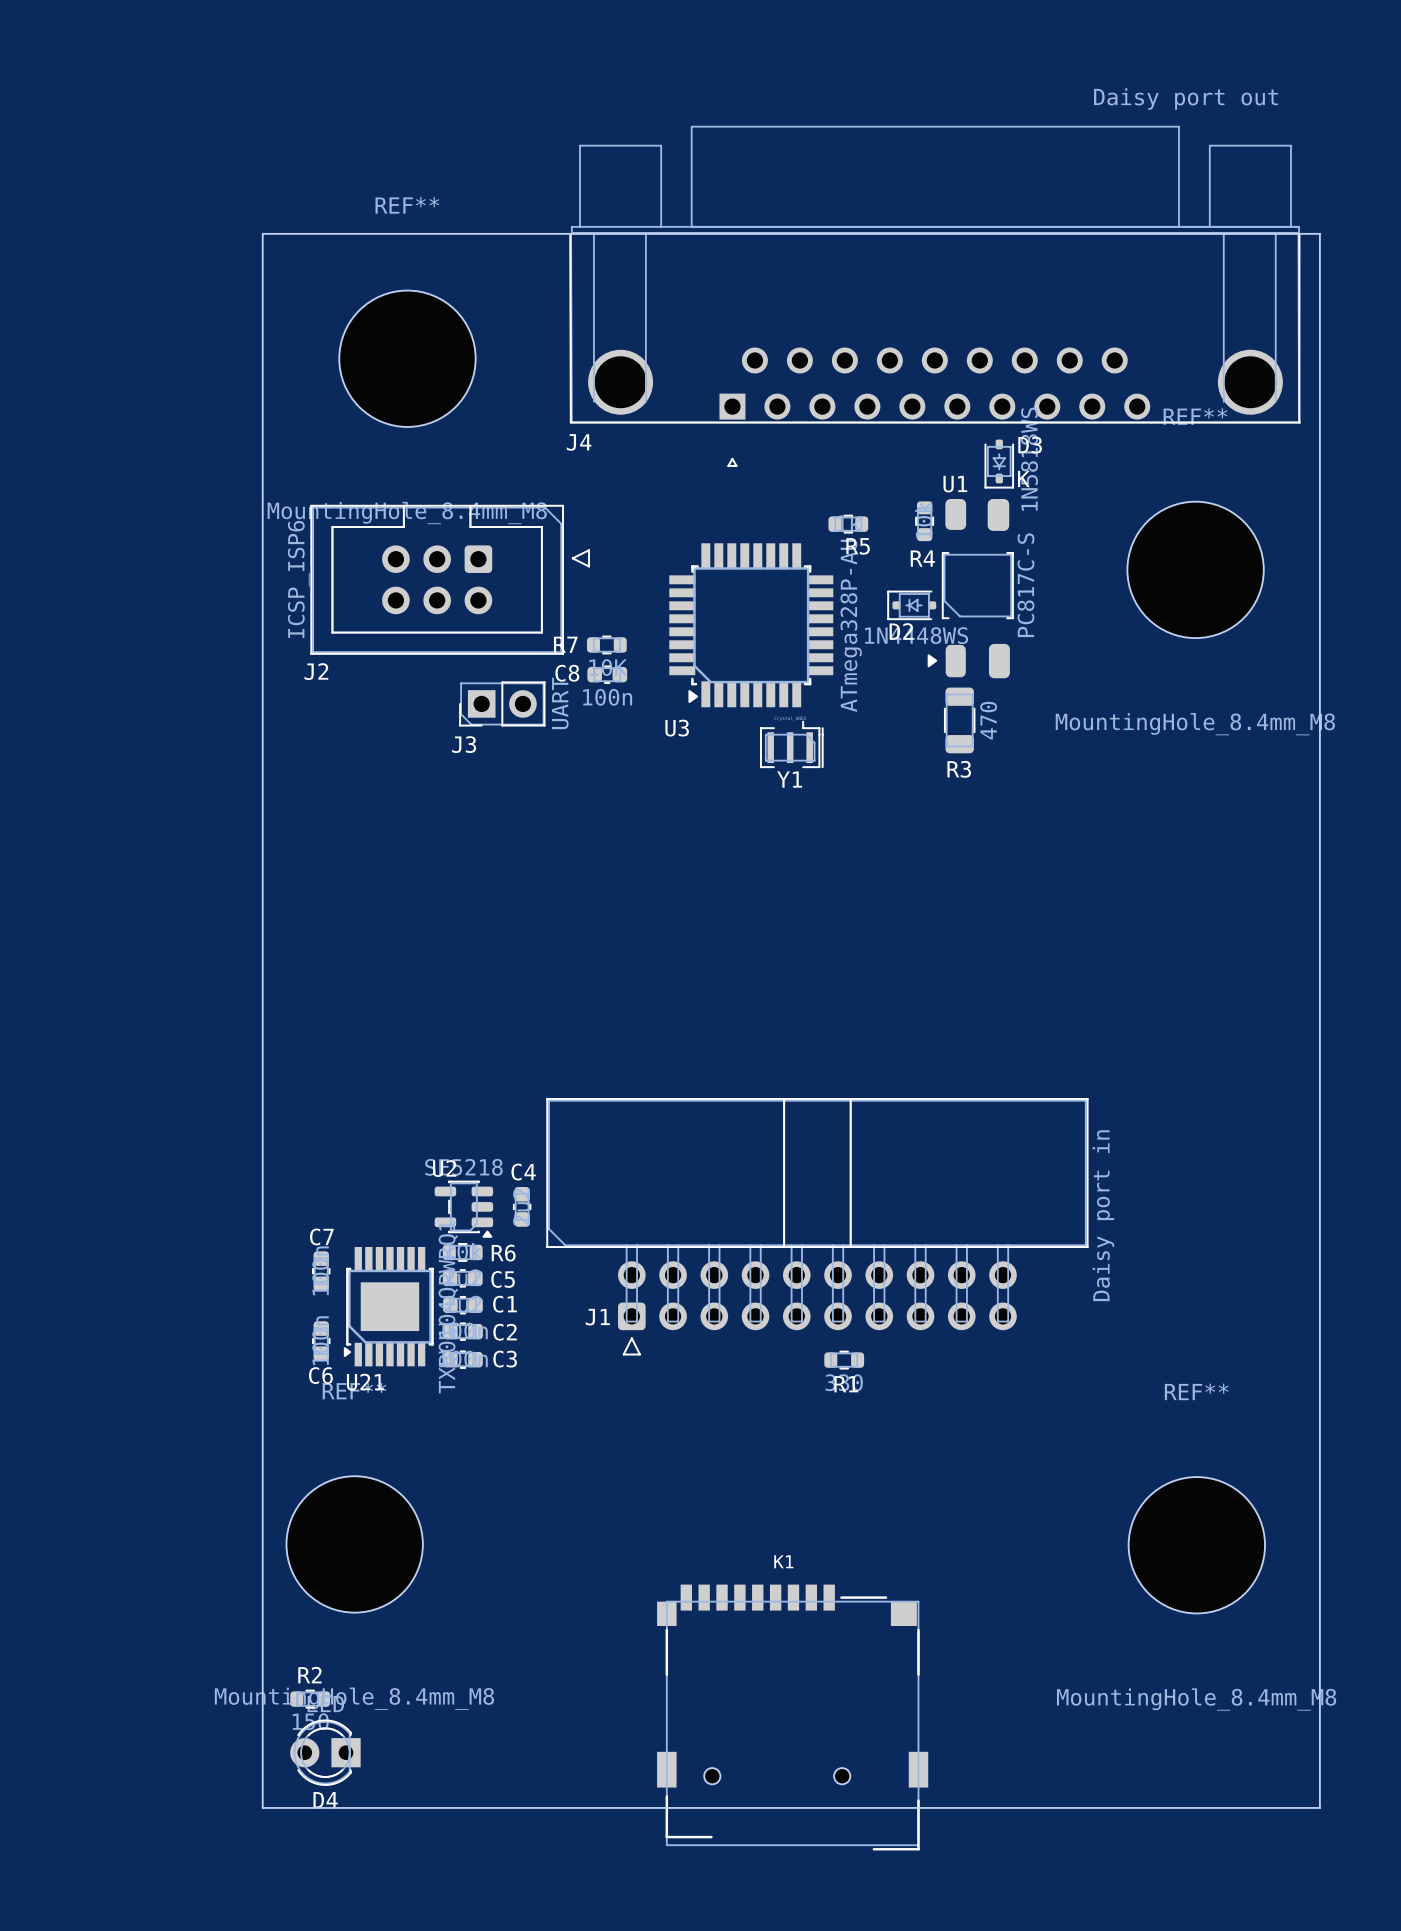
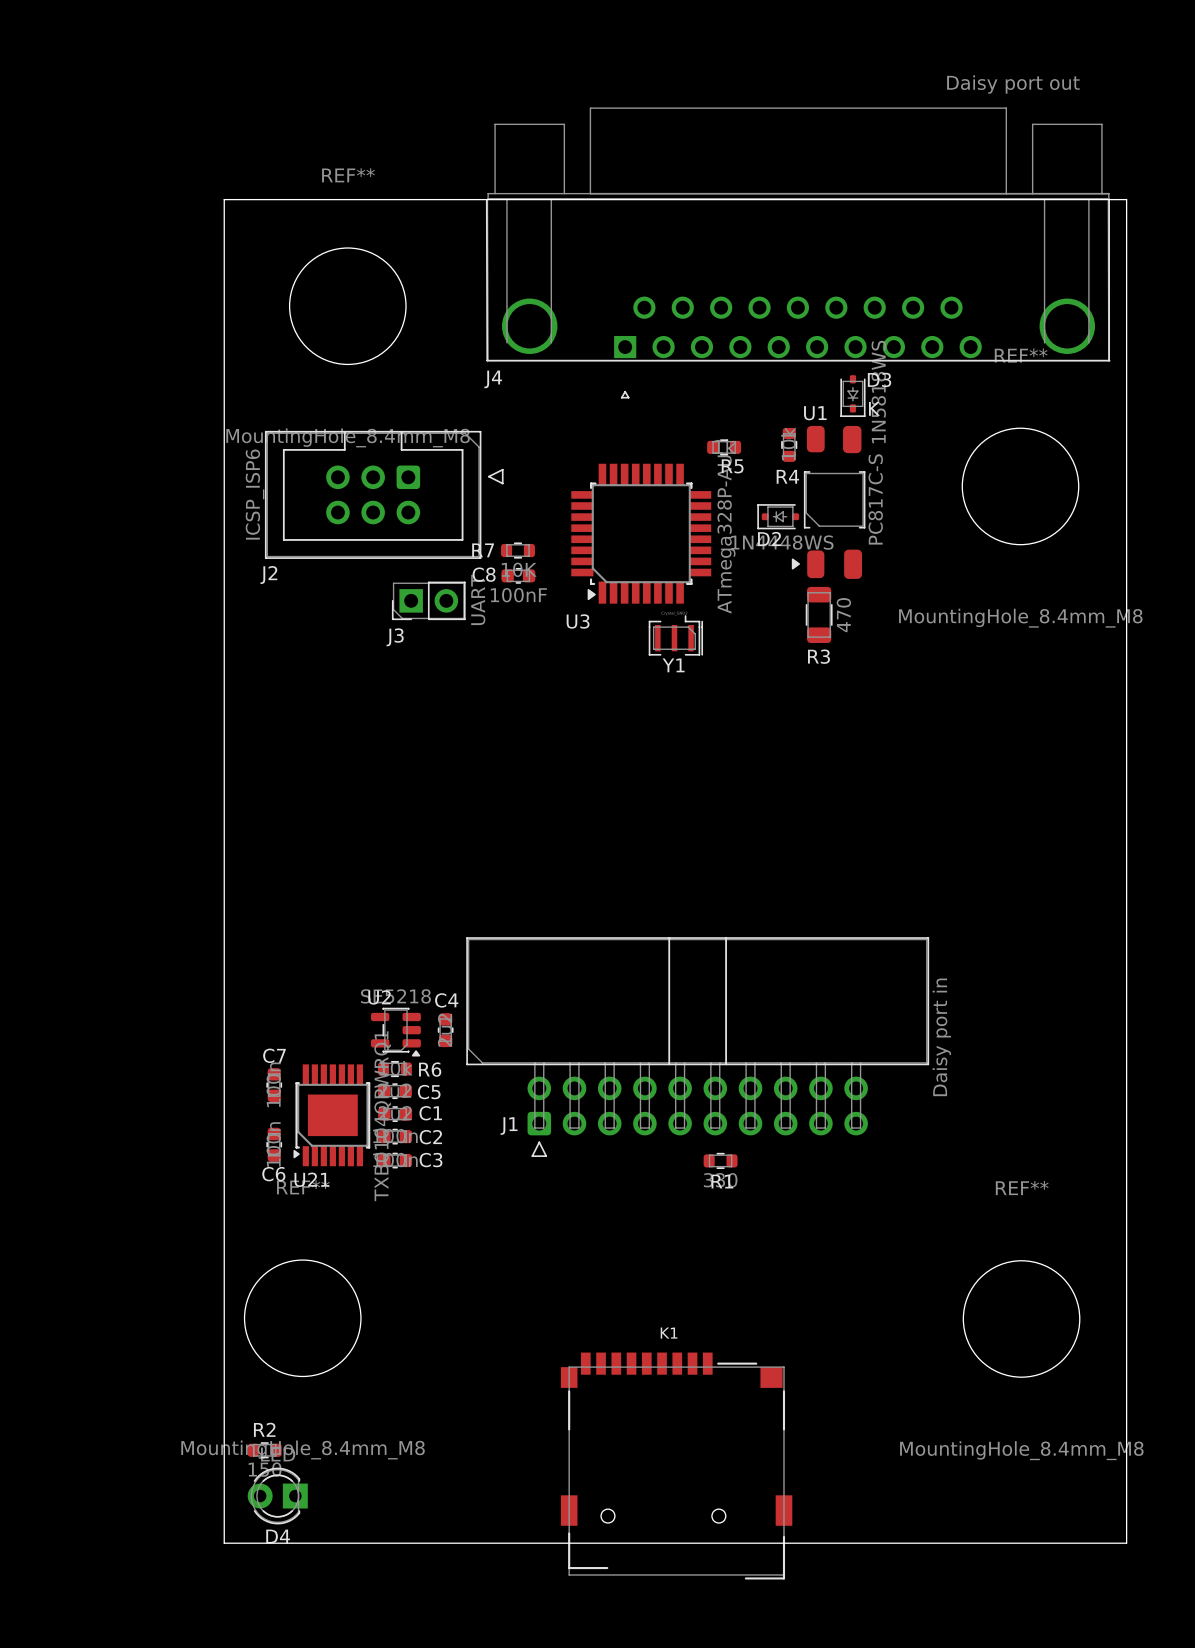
C8 value: 100n (607, 697) -> 100nF (518, 595)

